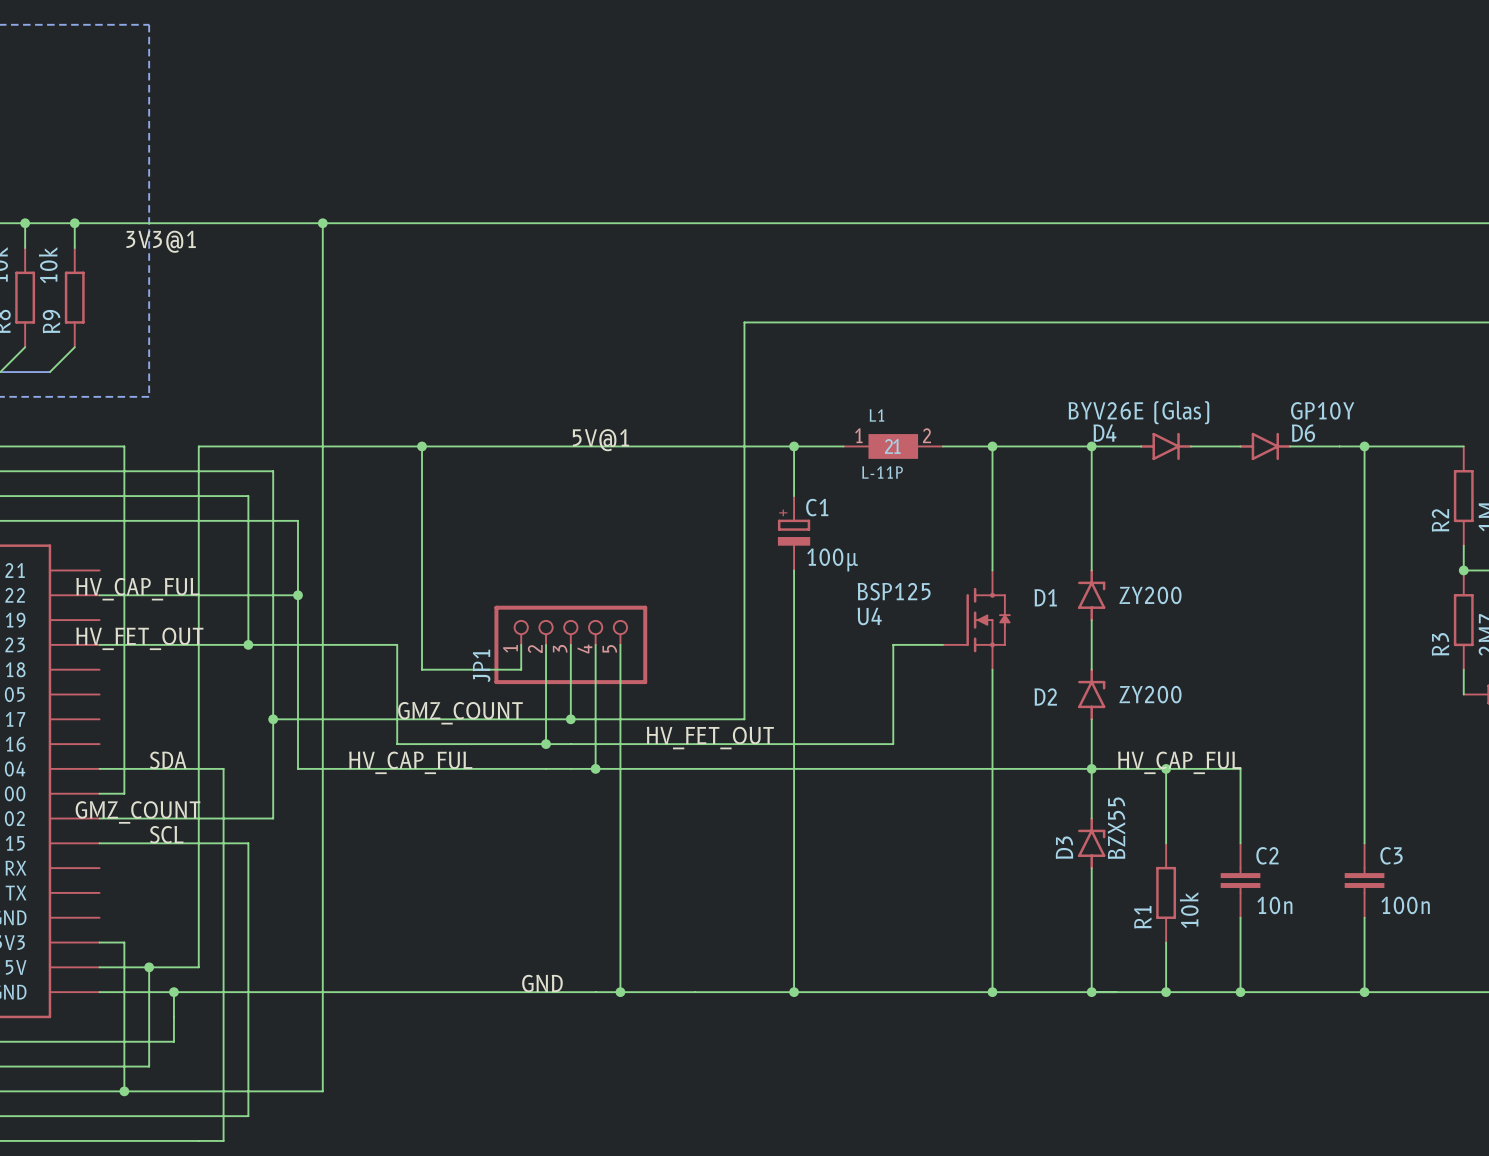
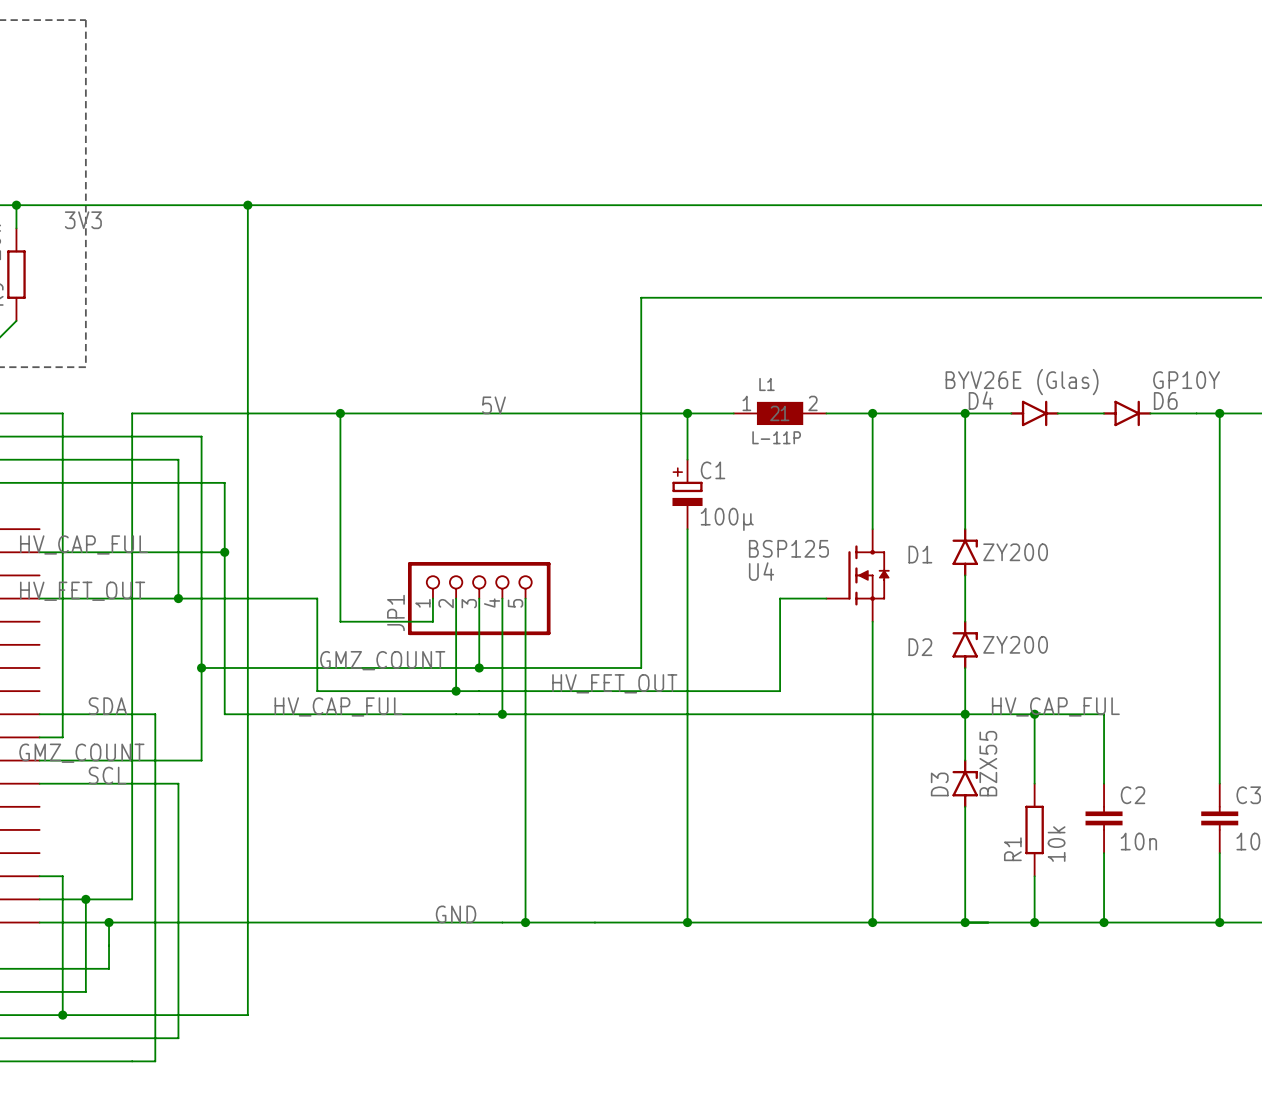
label: 3V3@1 (161, 241) -> 3V3 (83, 220)
label: 5V@1 (600, 440) -> 5V (493, 405)

